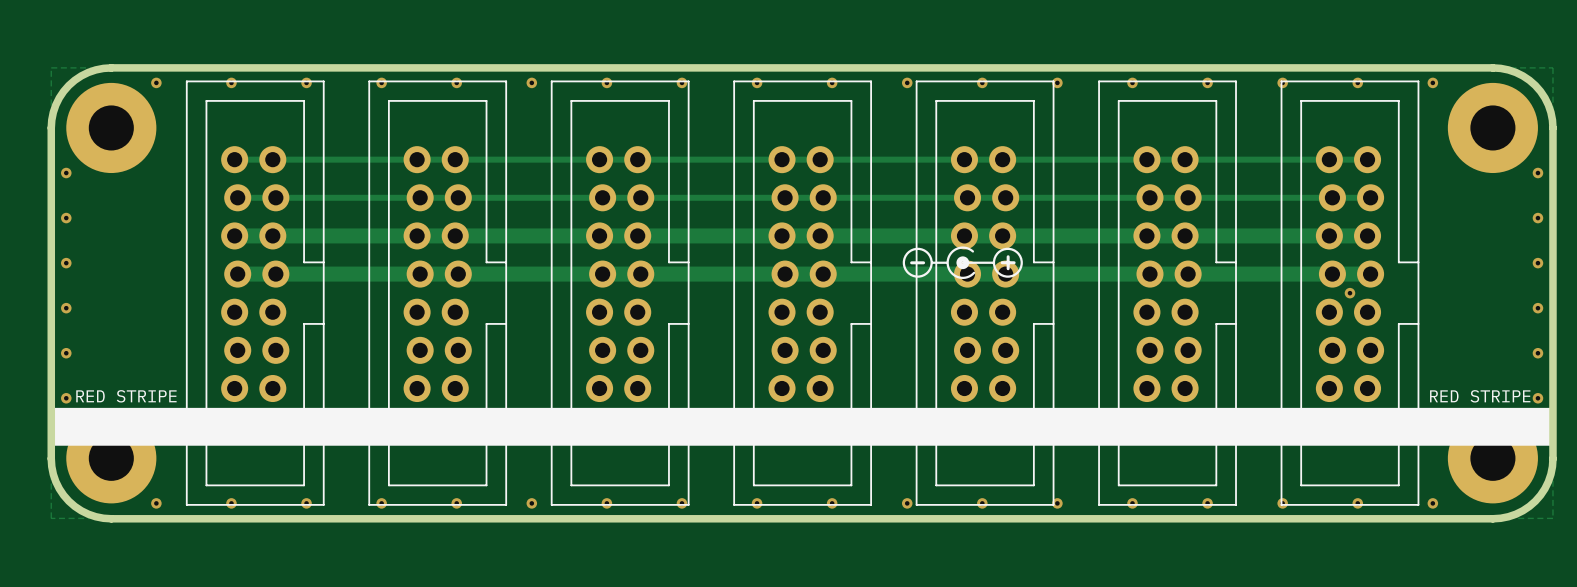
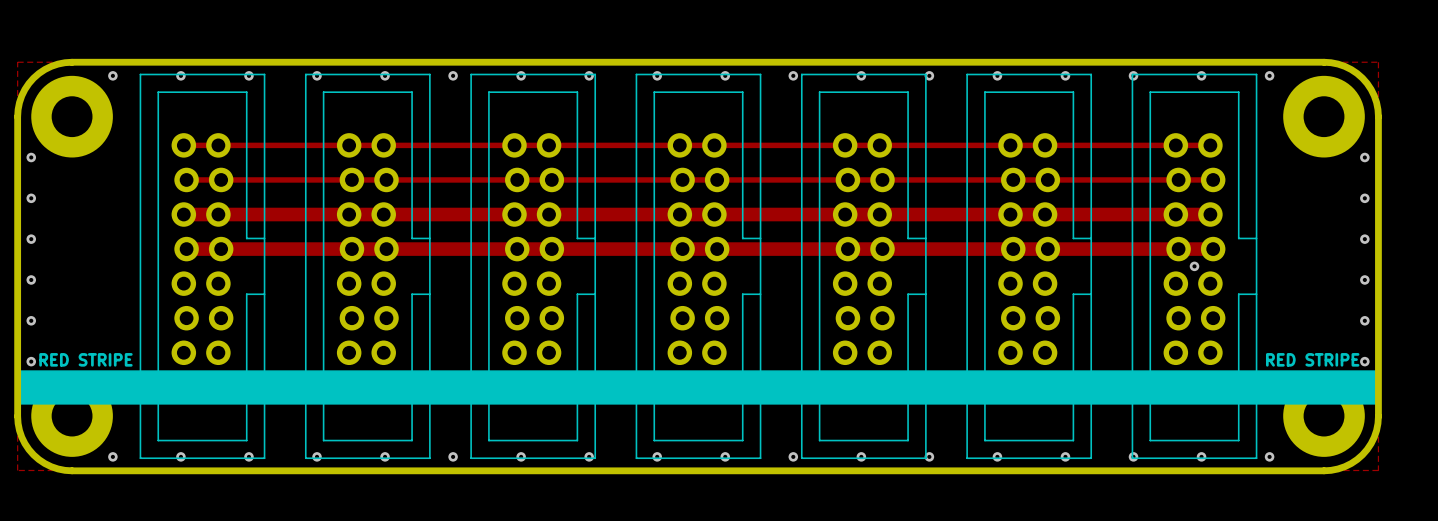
drawing: [902, 246, 1023, 280] -> none

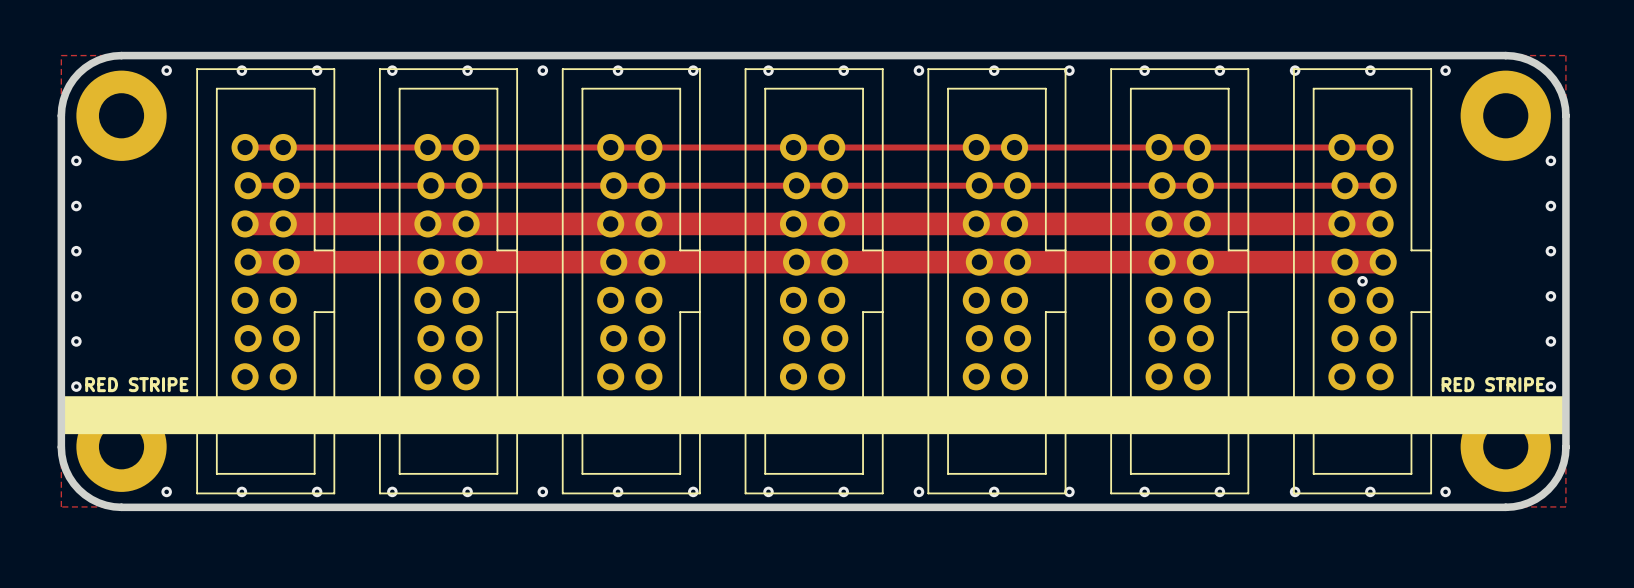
track width: thin (183, 214) (1210, 214) -> thick (245, 223) (1380, 223)
track width: thin (186, 249) (1213, 249) -> thick (248, 262) (1383, 262)

